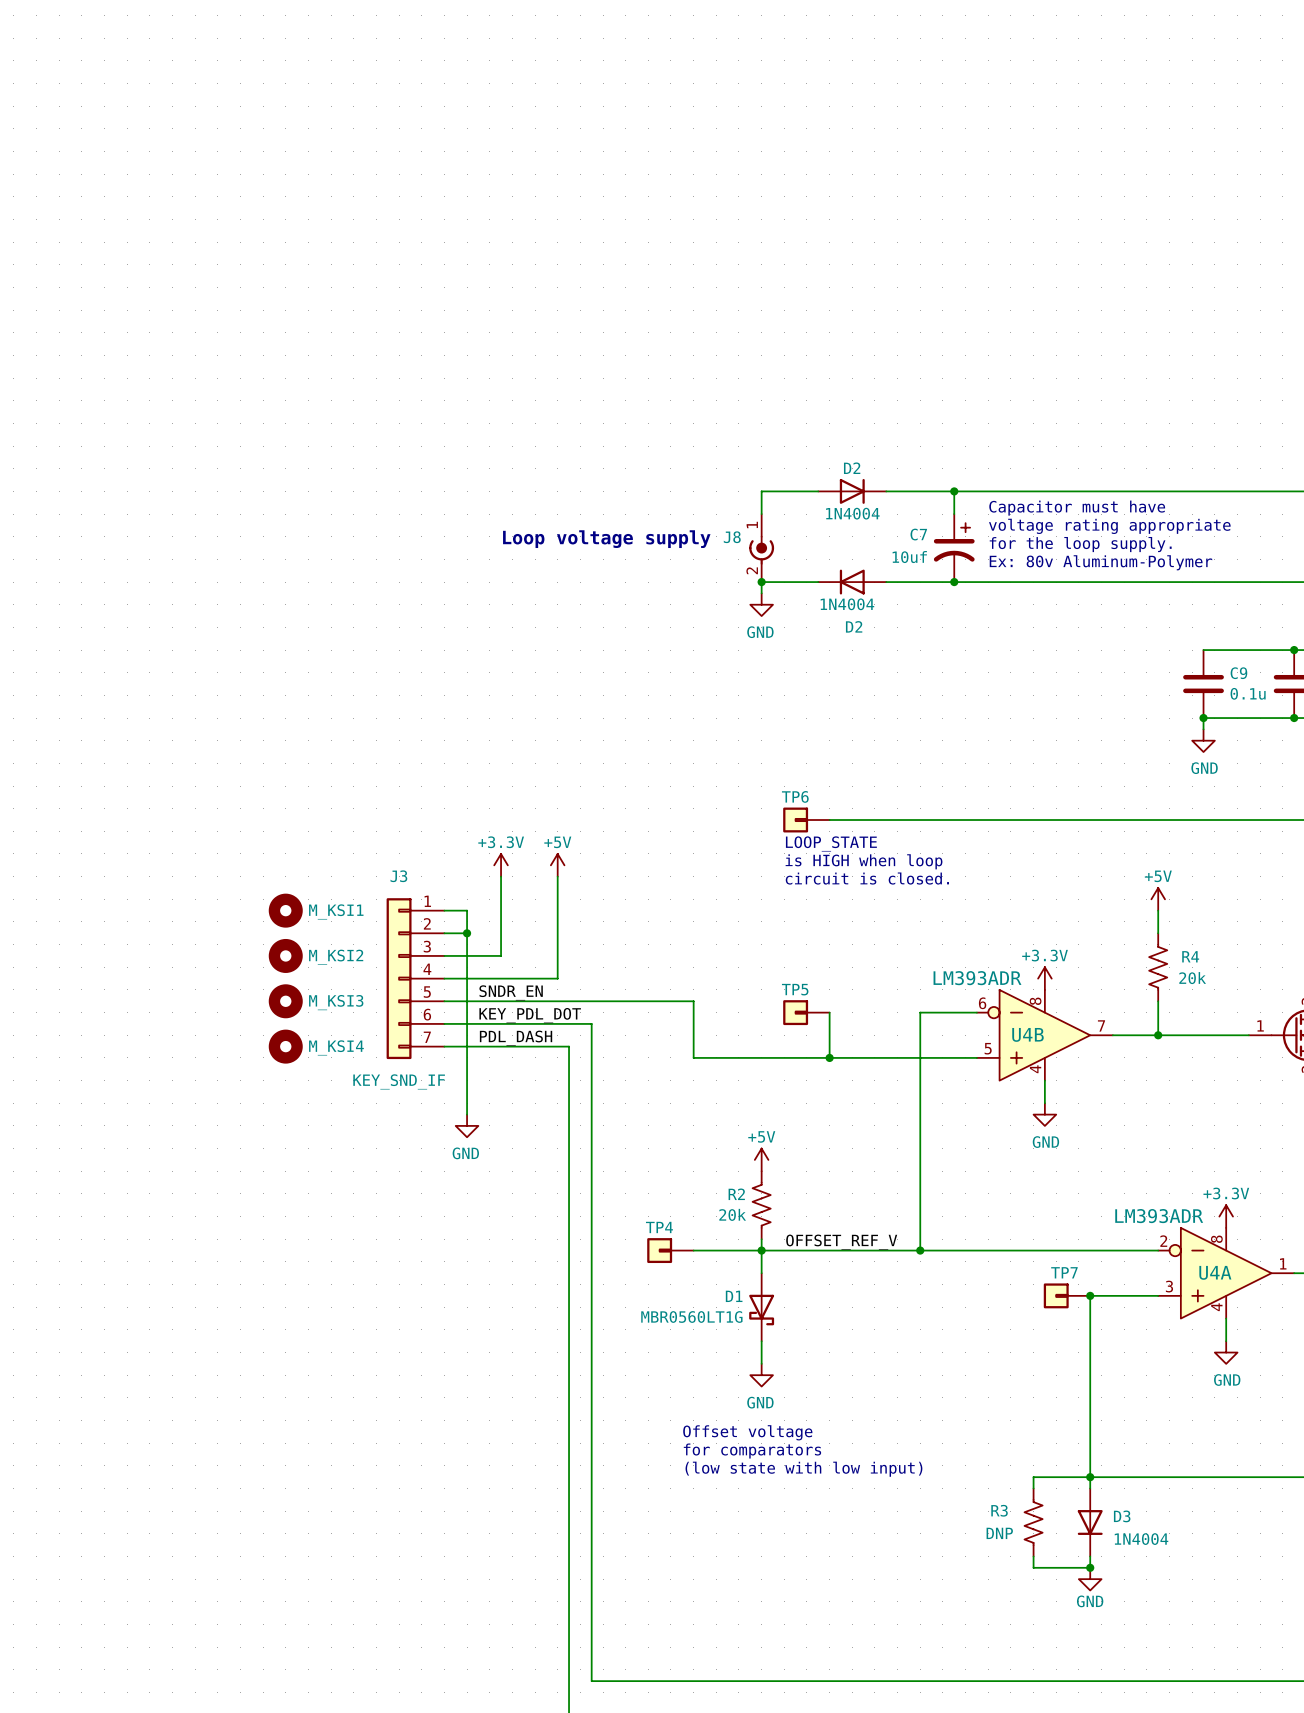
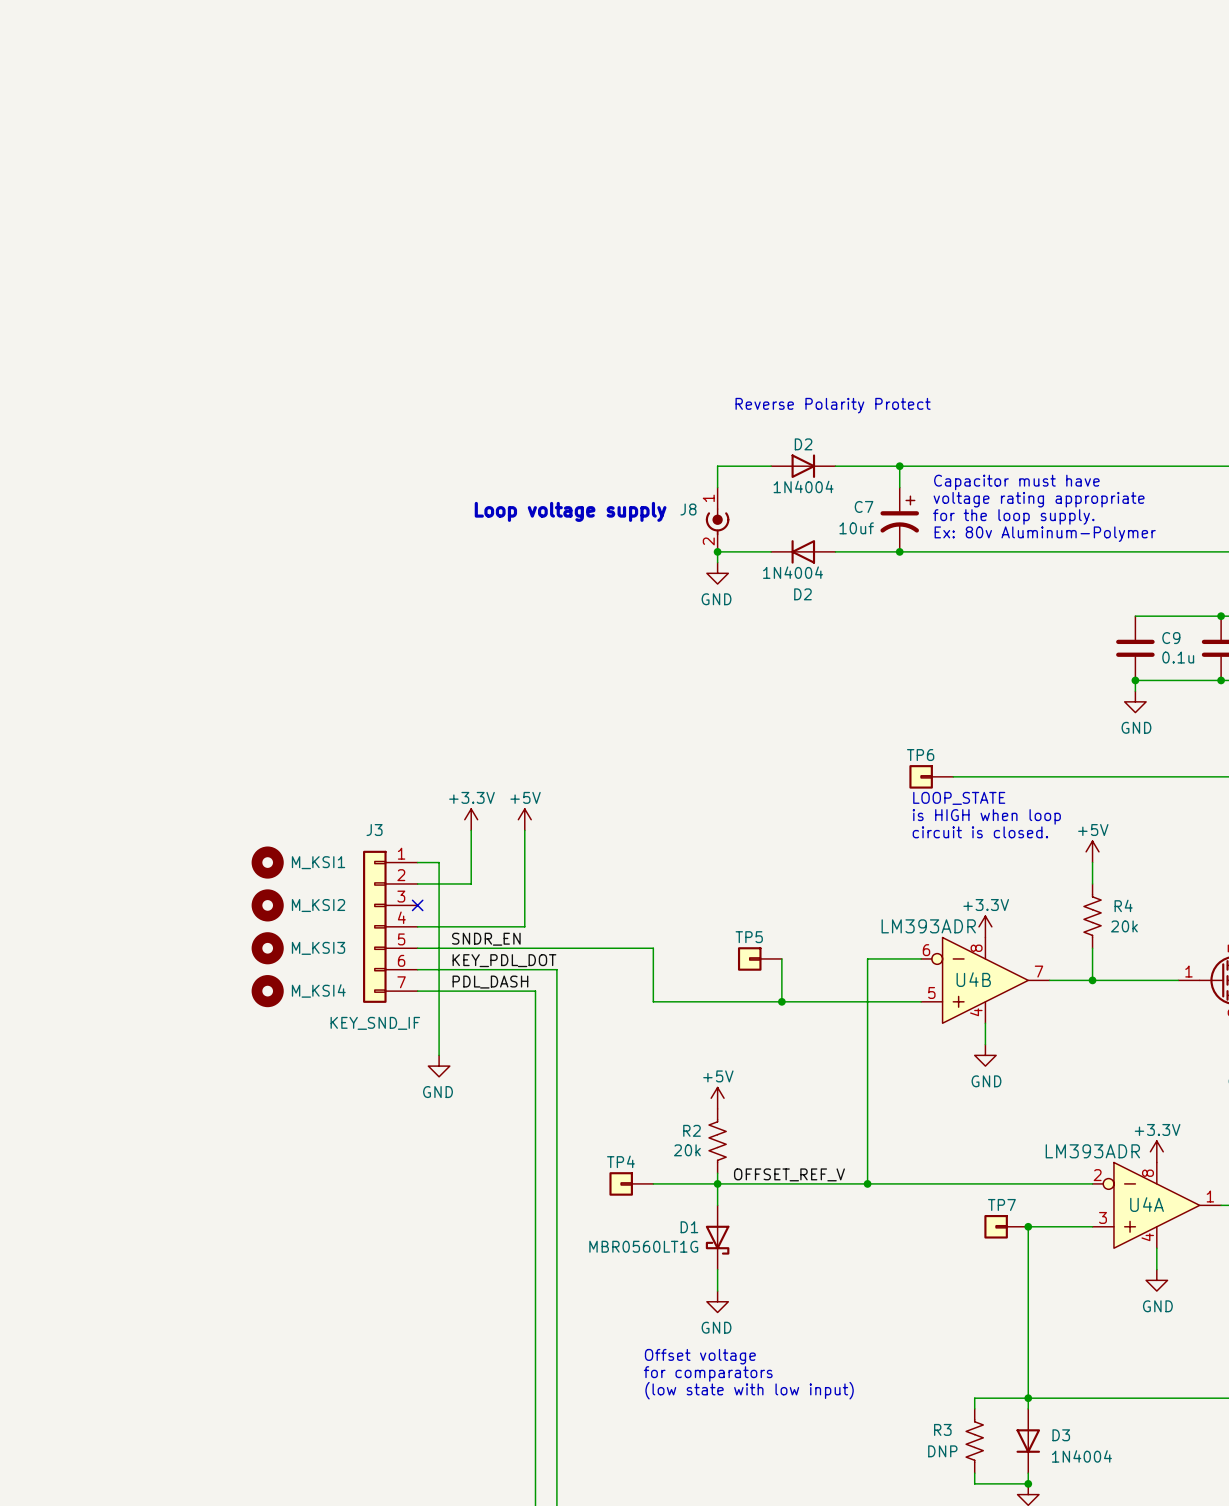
text: none -> Reverse Polarity Protect (833, 405)
TP6 position: (806, 820) -> (931, 776)
wire: (829, 820) (1010, 820) -> none
text position: LOOP_STATE (831, 843) -> LOOP_STATE (959, 798)
text position: is HIGH when loop (864, 861) -> is HIGH when loop (986, 816)
text position: circuit is closed. (867, 878) -> circuit is closed. (980, 832)
junction: (467, 933) -> none
wire: (501, 933) (501, 955) (444, 955) -> (471, 883) (439, 883)
no-connect mark: none -> (417, 905)

